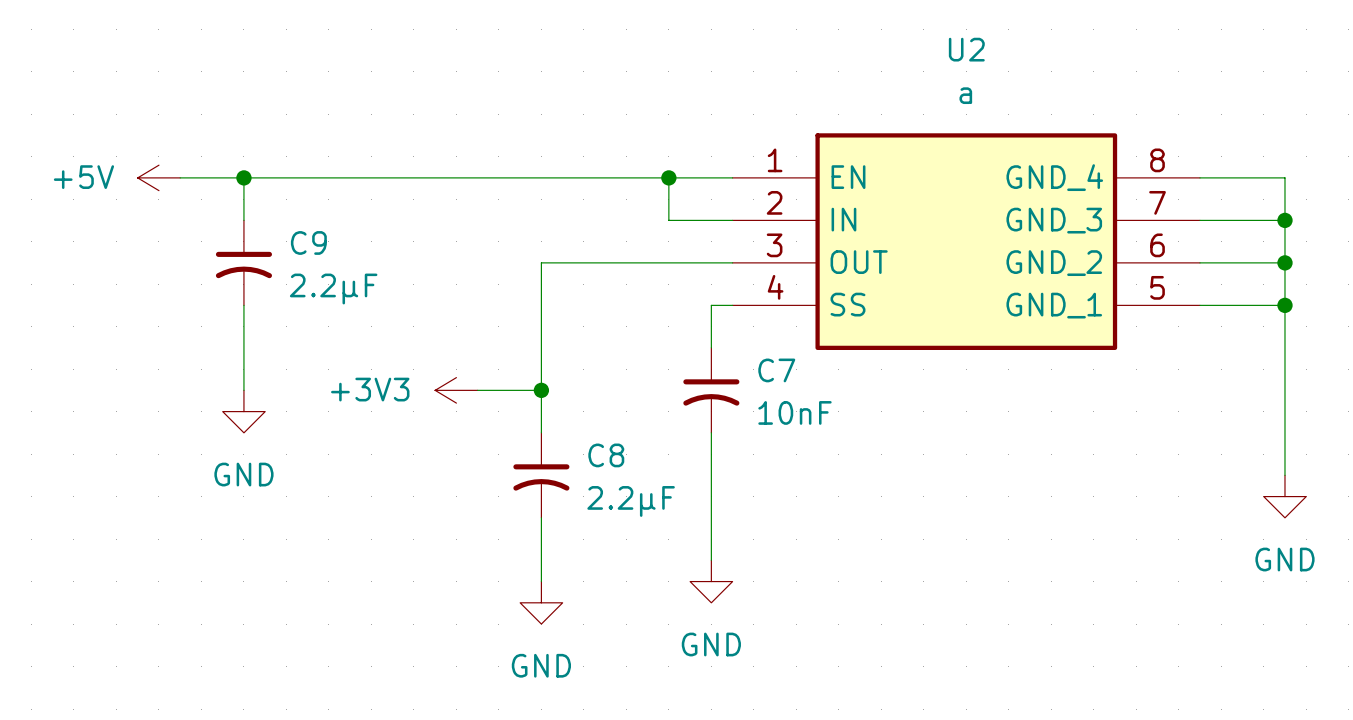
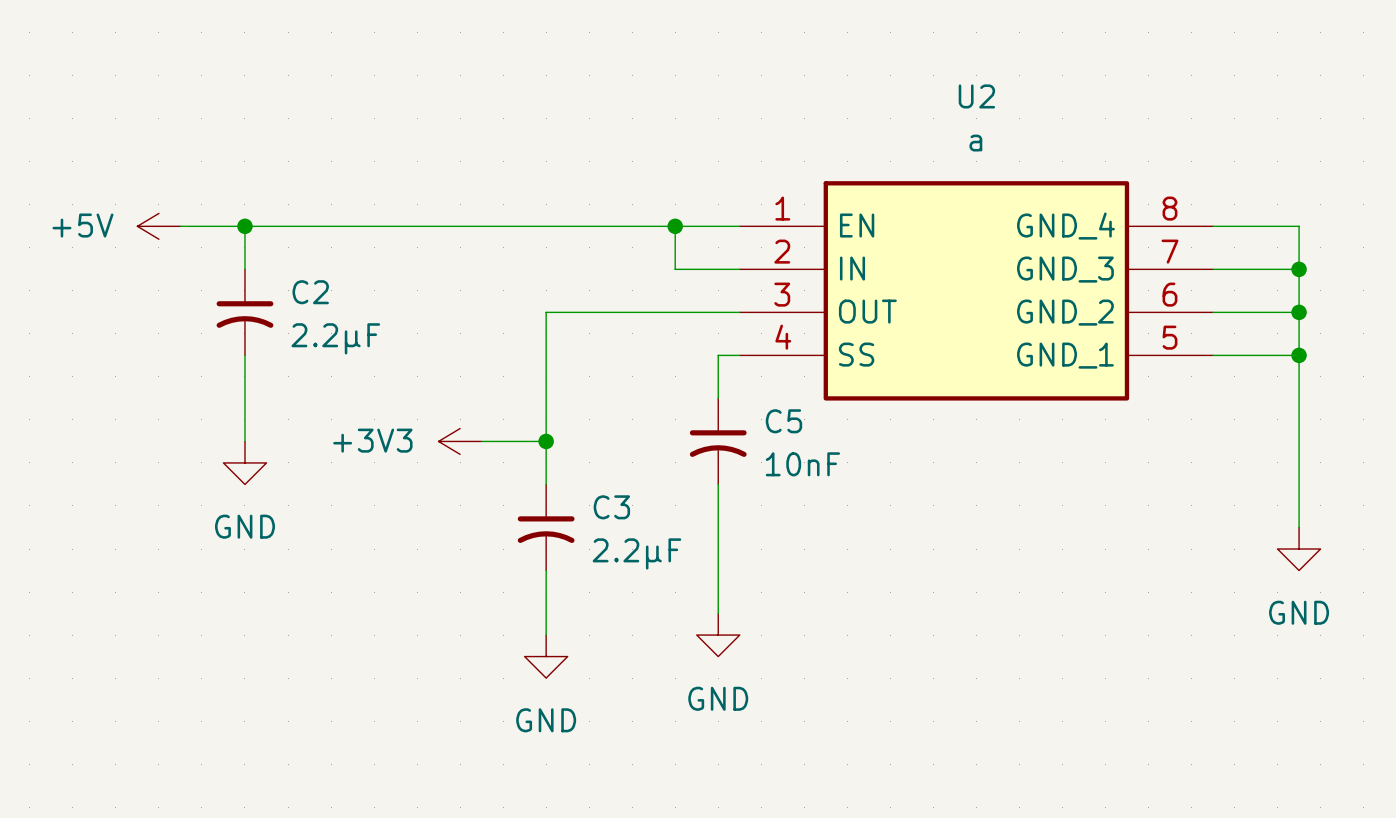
C9 name: C9 (308, 242) -> C2 (310, 292)
C7 name: C7 (776, 370) -> C5 (783, 421)
C8 name: C8 (606, 455) -> C3 (611, 507)

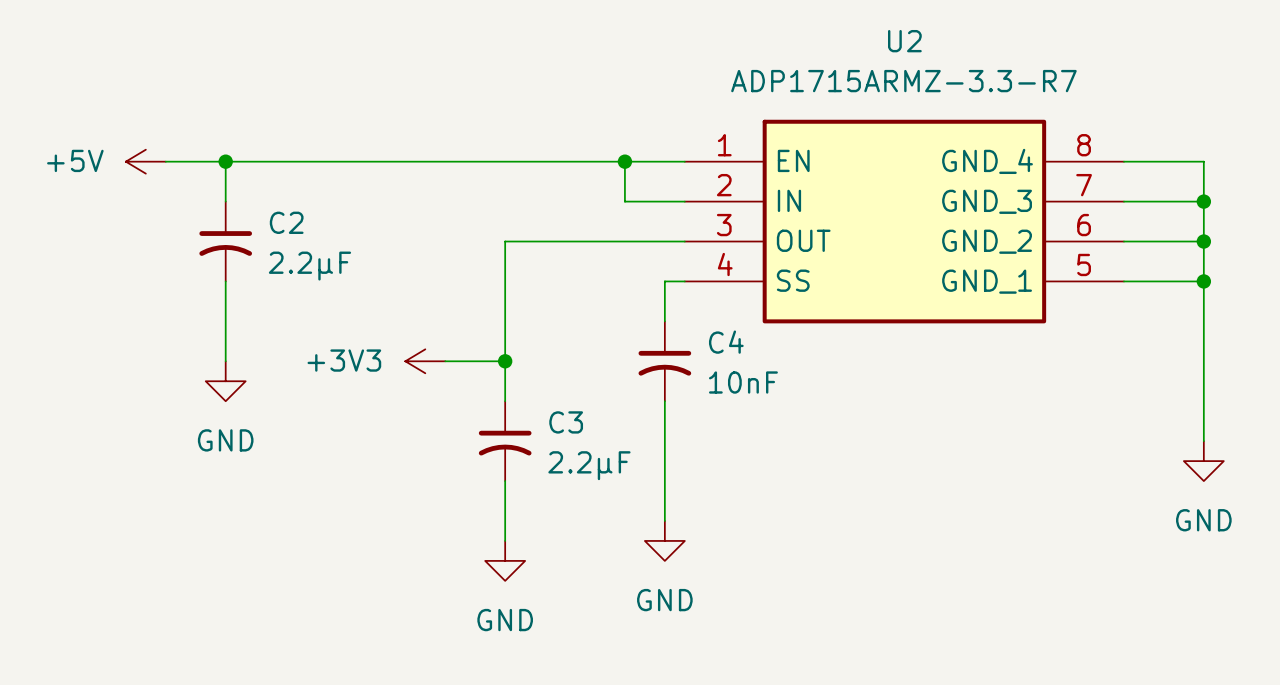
U2 value: a (975, 143) -> ADP1715ARMZ-3.3-R7 (903, 81)
C5 name: C5 (783, 421) -> C4 (726, 342)

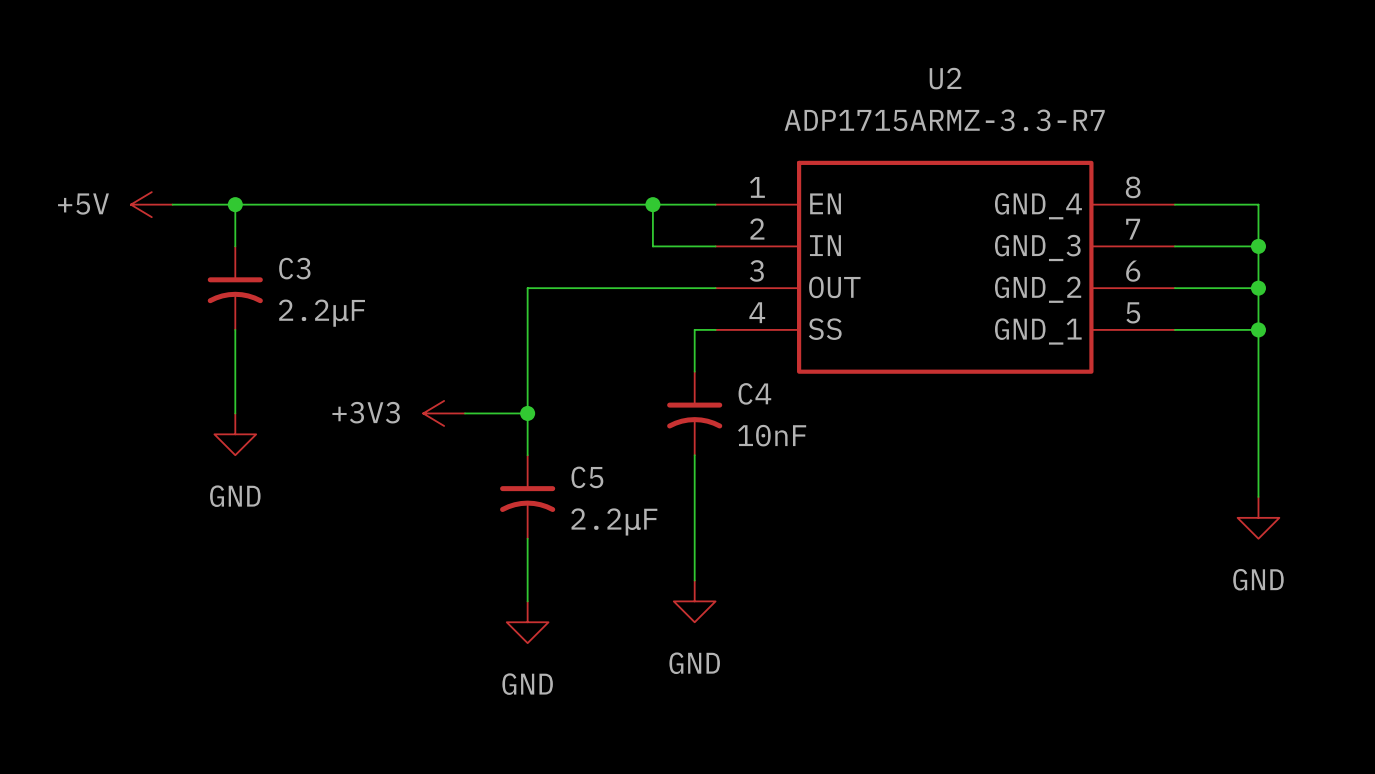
C2 name: C2 (286, 222) -> C3 (294, 268)
C3 name: C3 (566, 422) -> C5 (587, 477)

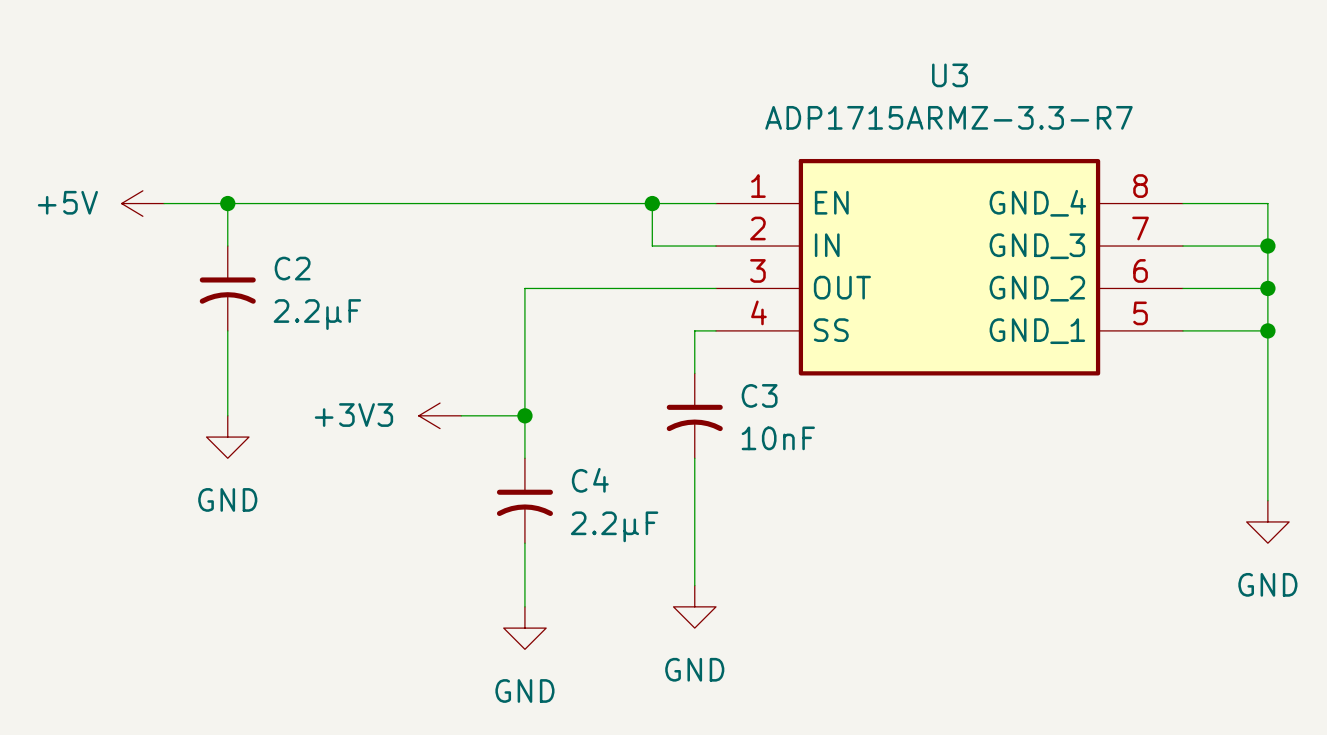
U2 name: U2 (945, 78) -> U3 (949, 75)
C3 name: C3 (294, 268) -> C2 (292, 268)
C4 name: C4 (754, 393) -> C3 (759, 395)
C5 name: C5 (587, 477) -> C4 (590, 480)

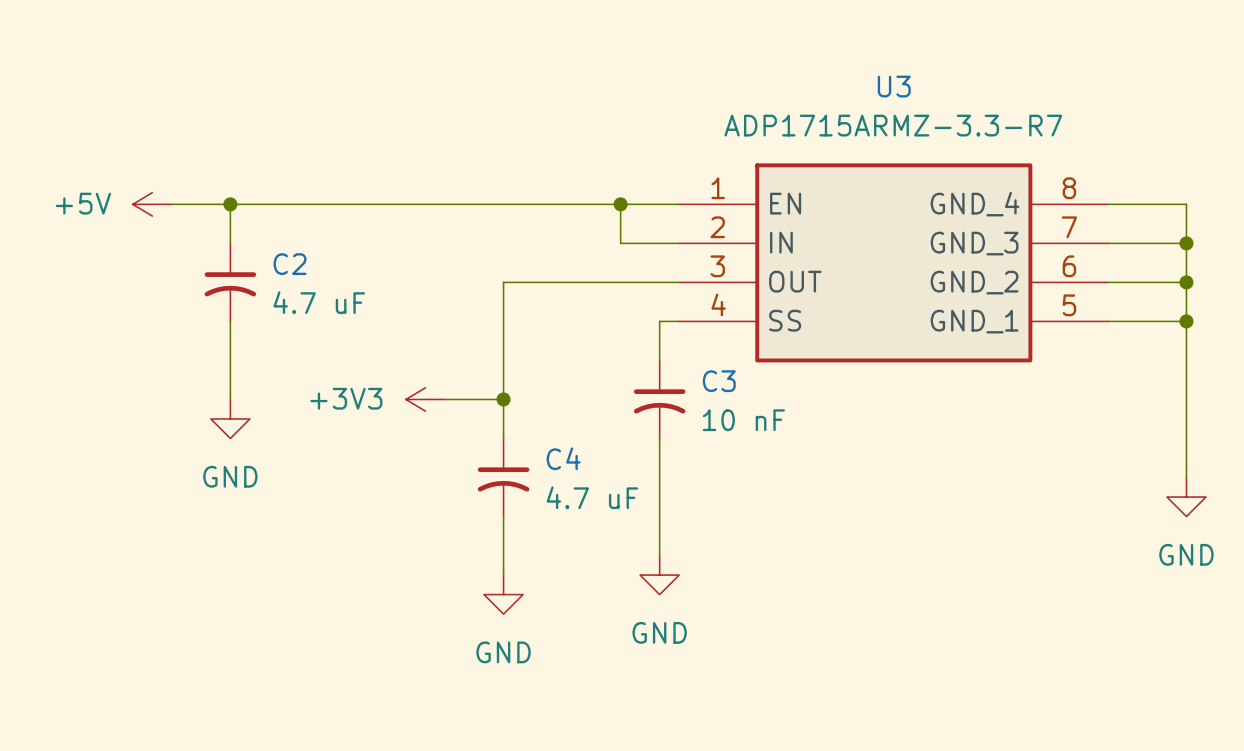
C2 value: 2.2μF (317, 314) -> 4.7 uF (319, 302)
C3 value: 10nF (778, 438) -> 10 nF (743, 420)
C4 value: 2.2μF (614, 526) -> 4.7 uF (592, 497)

